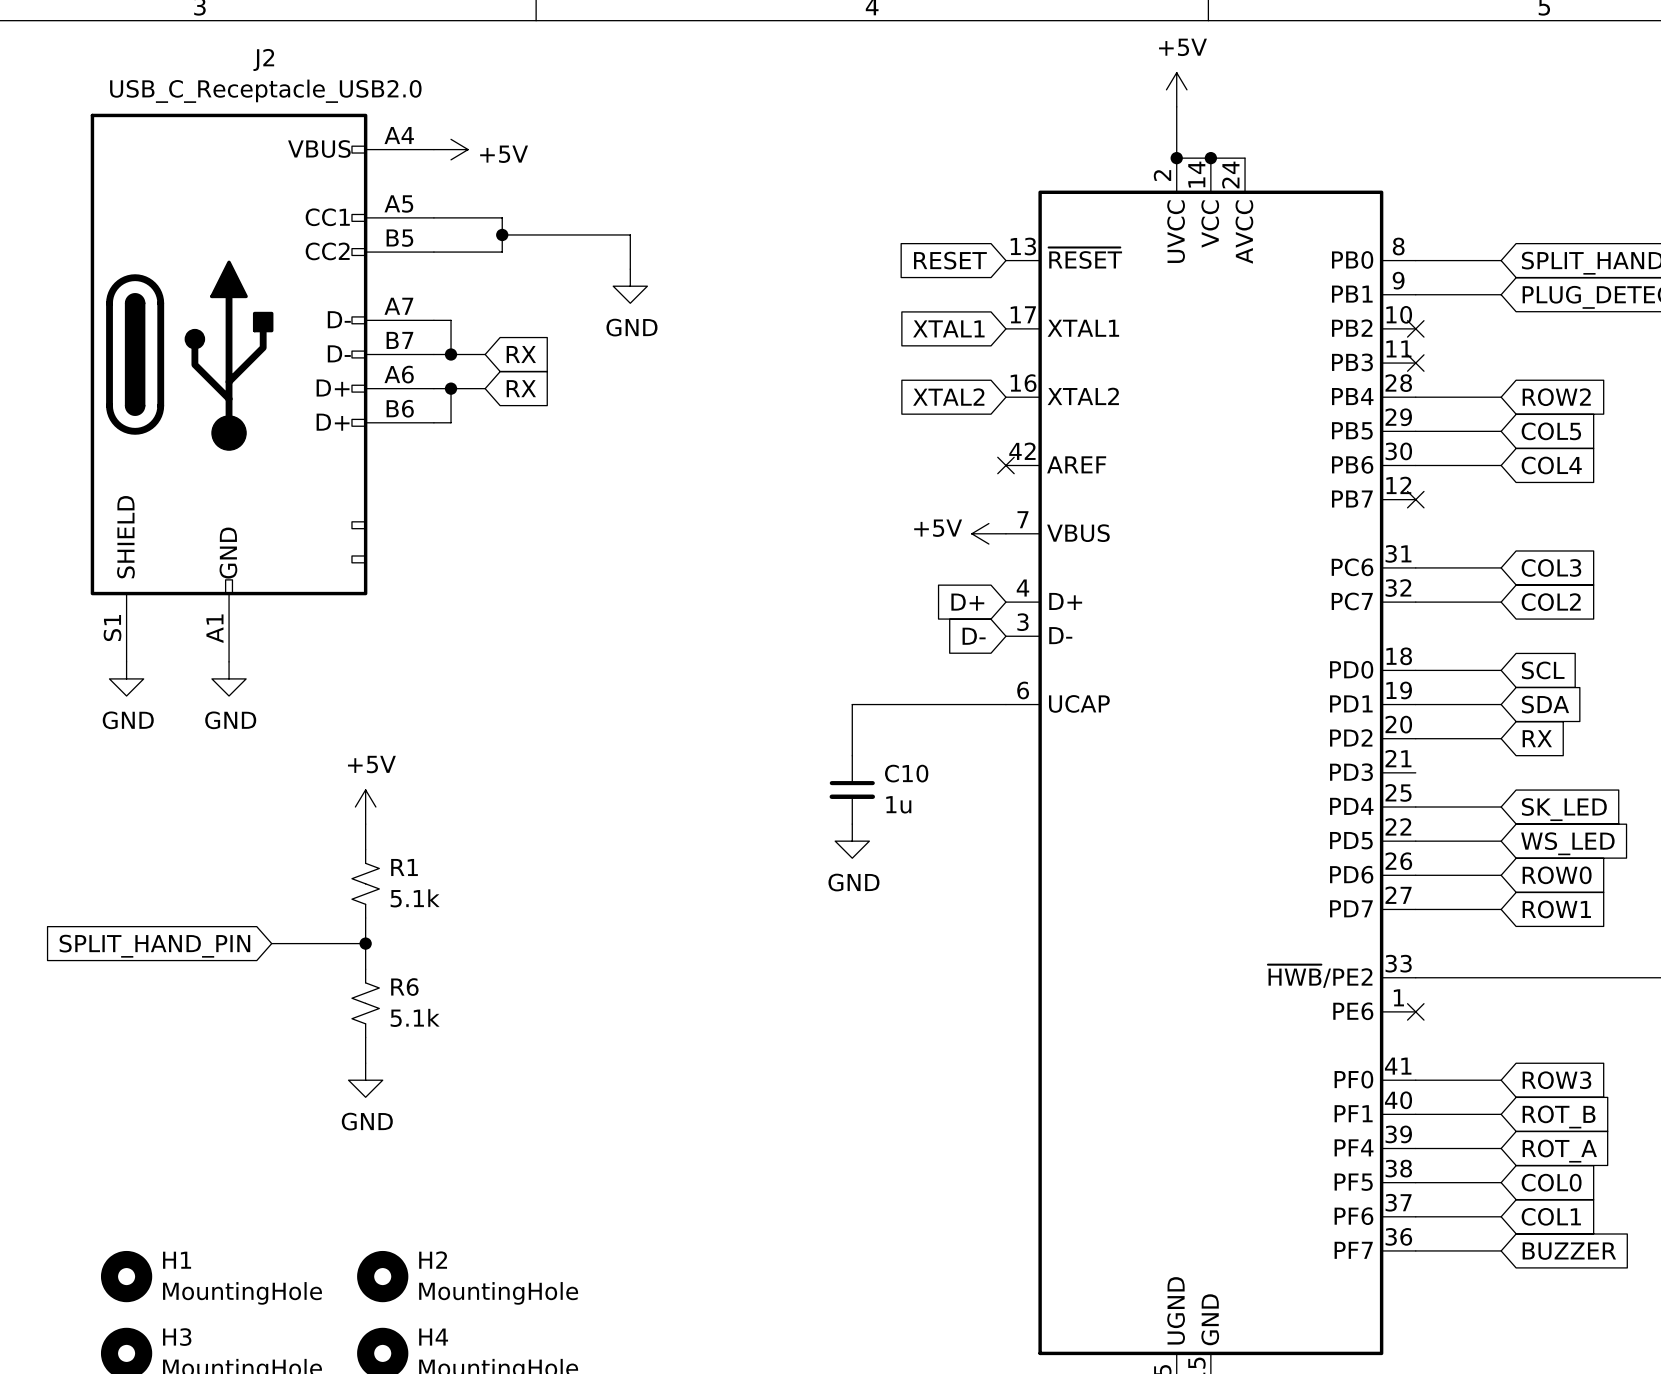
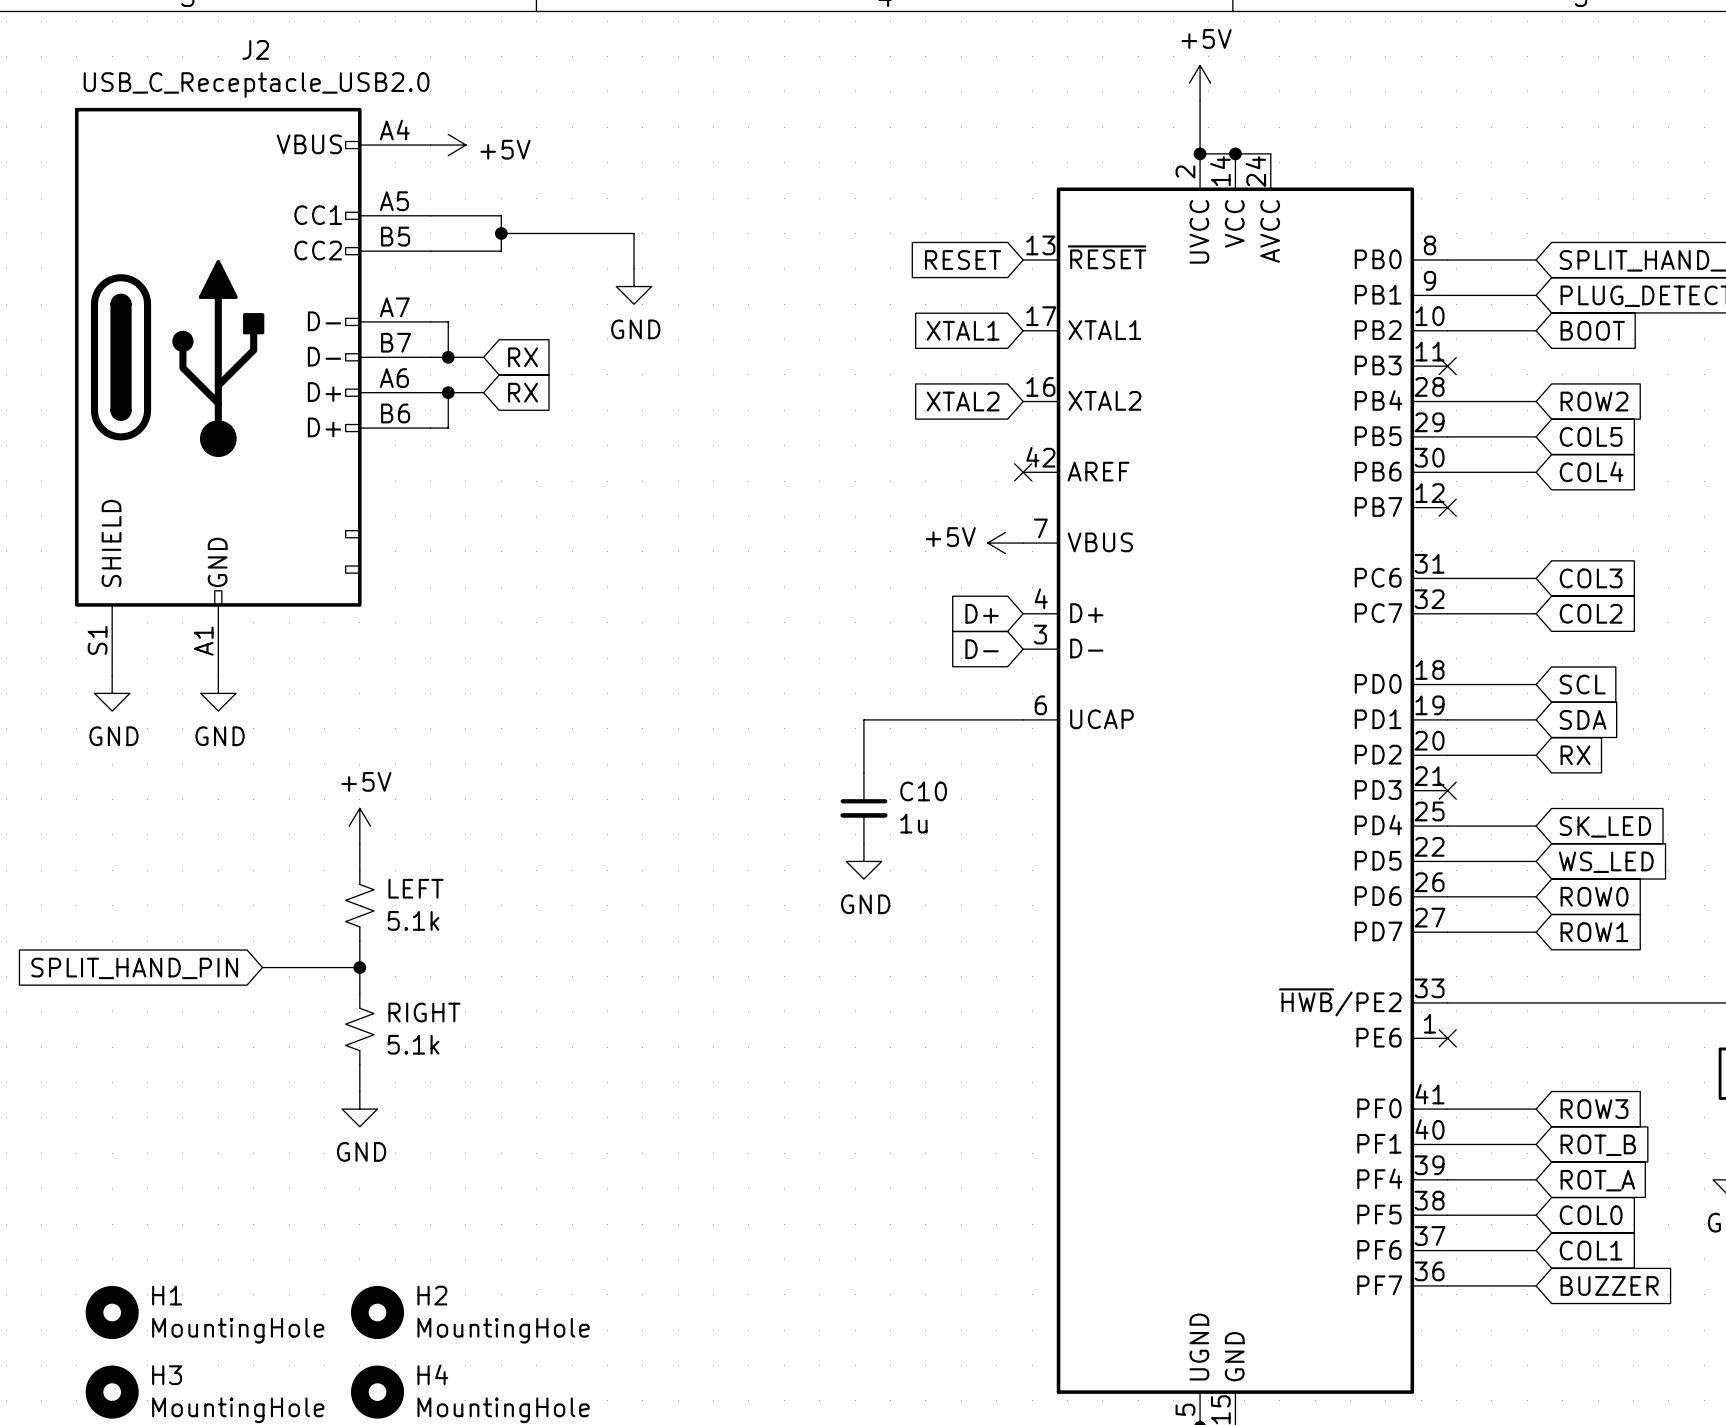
wire: none -> (1447, 330) (1536, 330)
no-connect mark: (1415, 328) -> none
global label: none -> BOOT (1592, 330)
no-connect mark: none -> (1447, 790)
R1 name: R1 (404, 867) -> LEFT (416, 888)
R6 name: R6 (404, 987) -> RIGHT (424, 1012)

